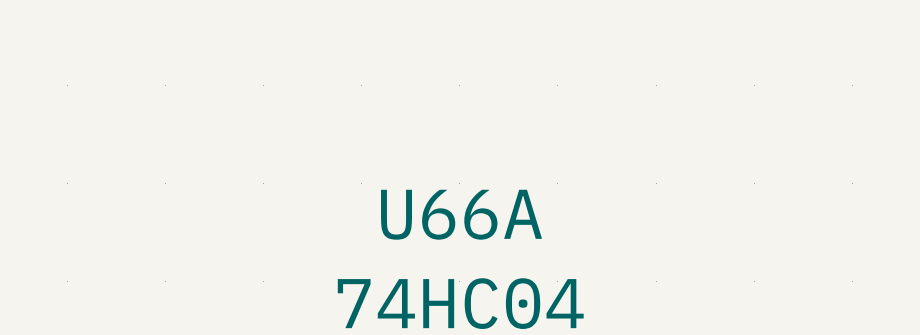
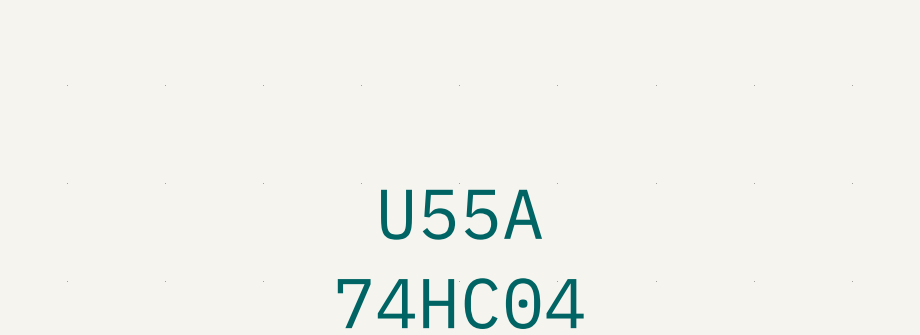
U66A name: U66A (461, 214) -> U55A (461, 214)

